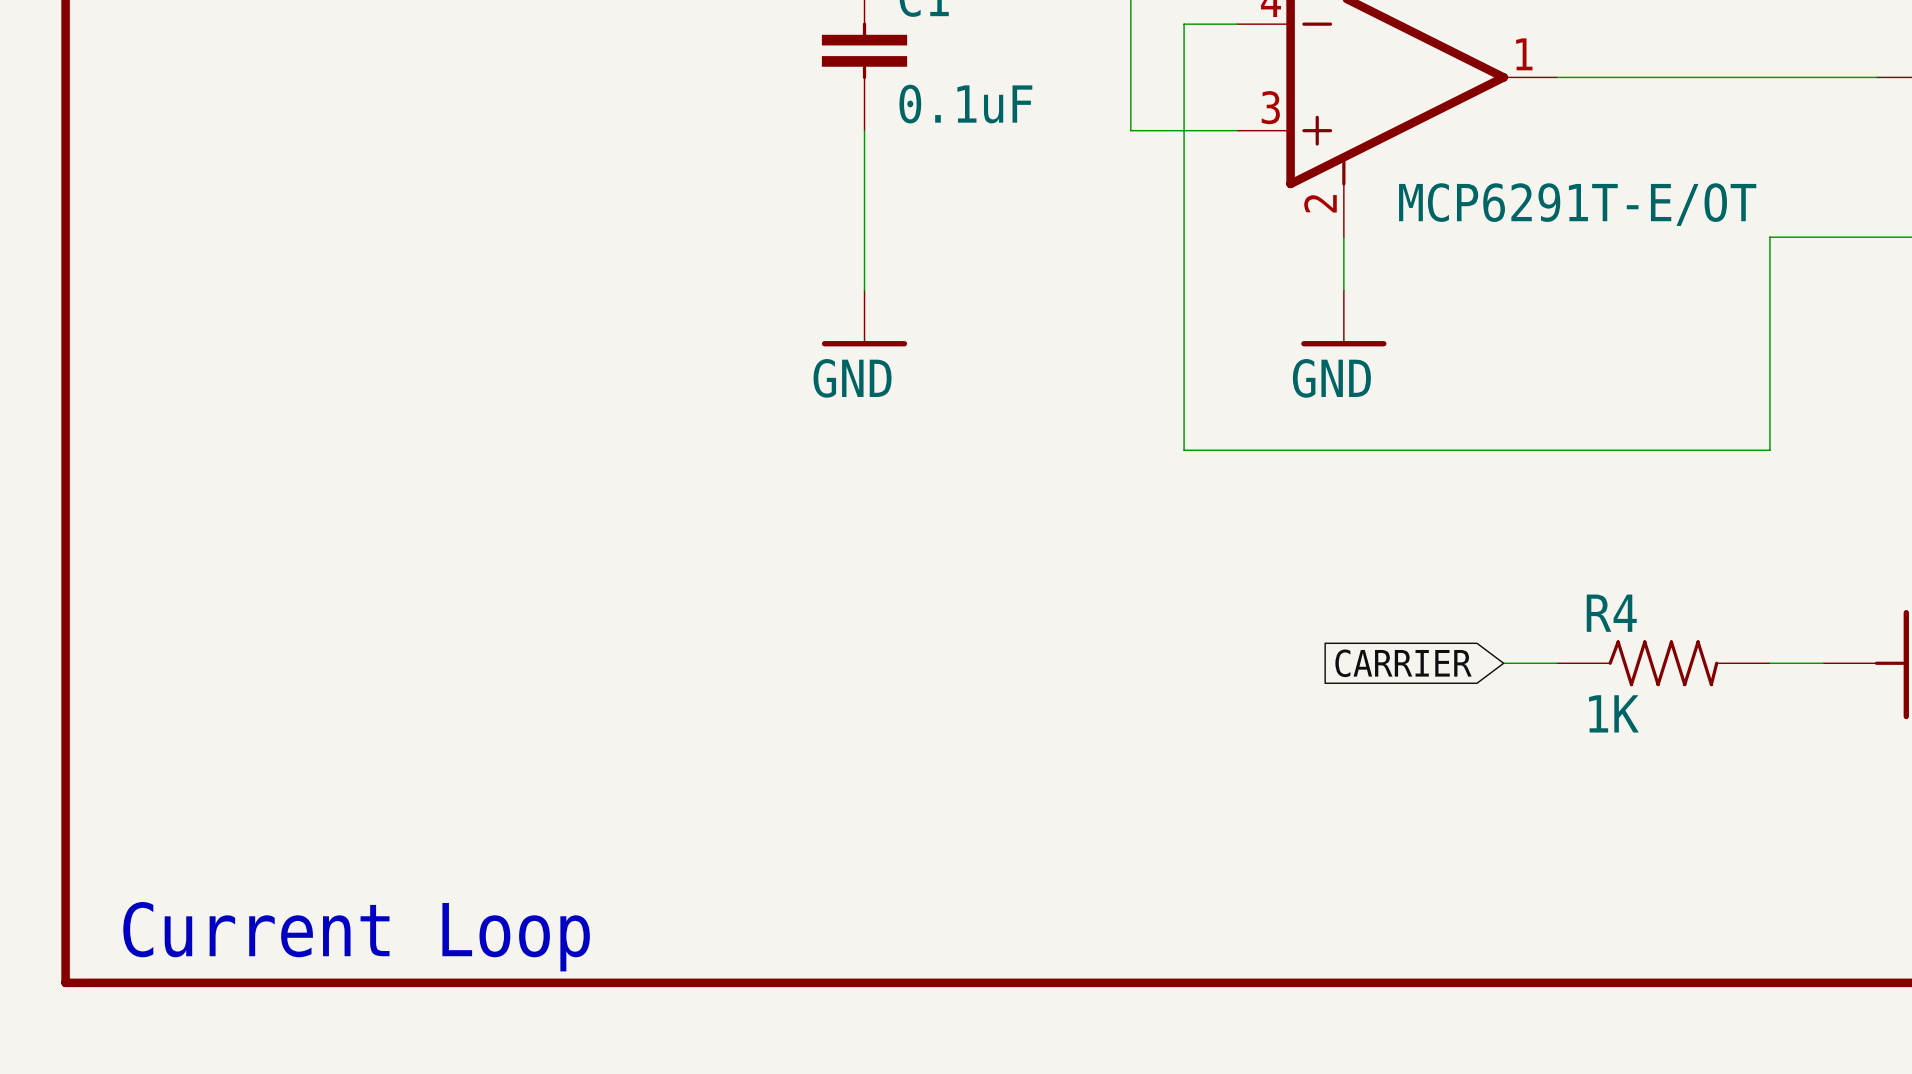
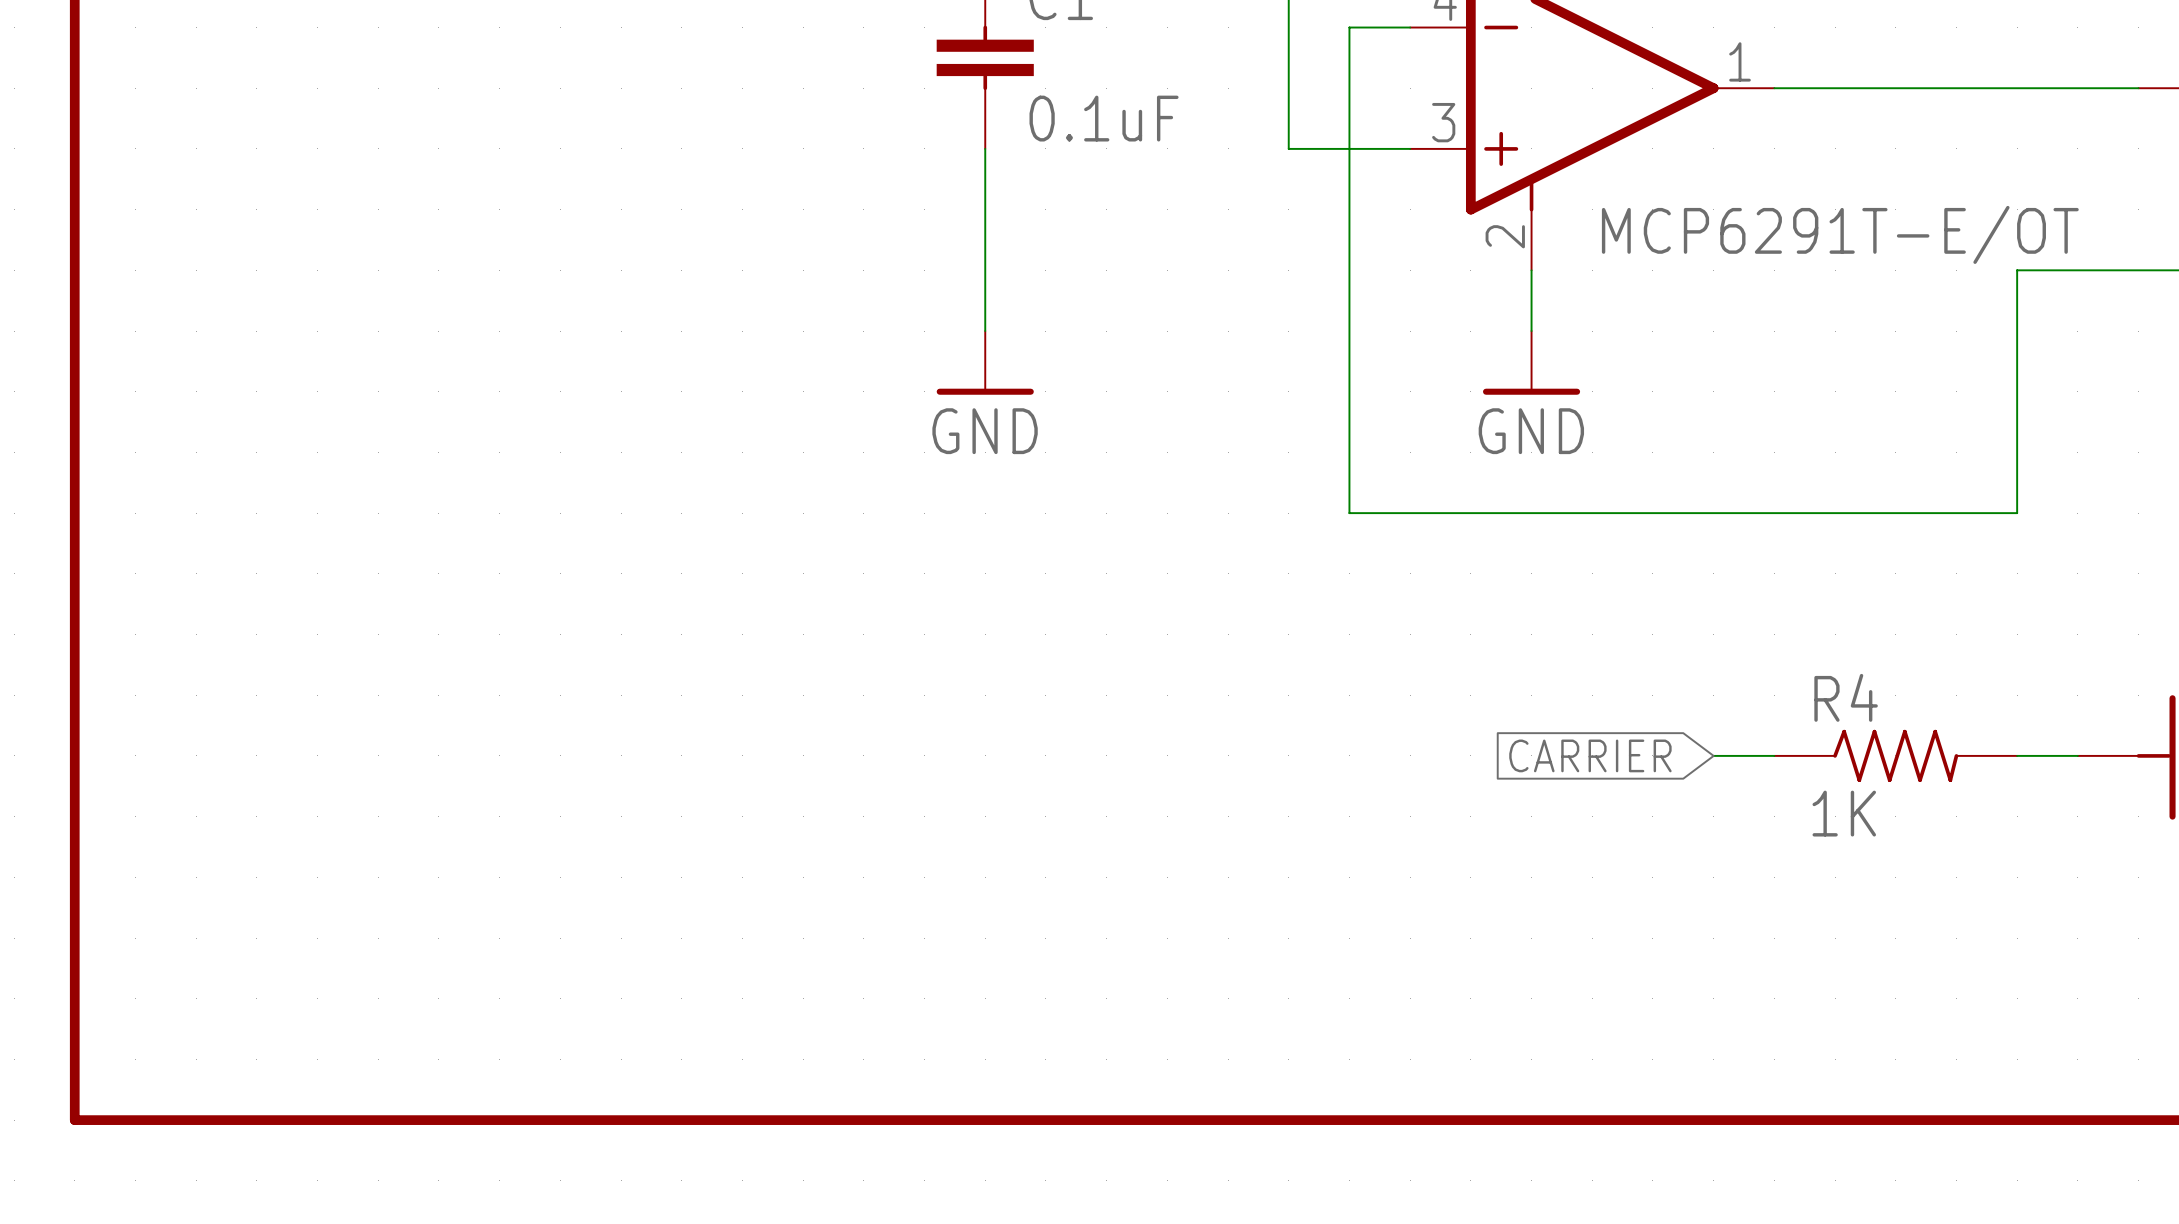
text: Current Loop (356, 936) -> none

